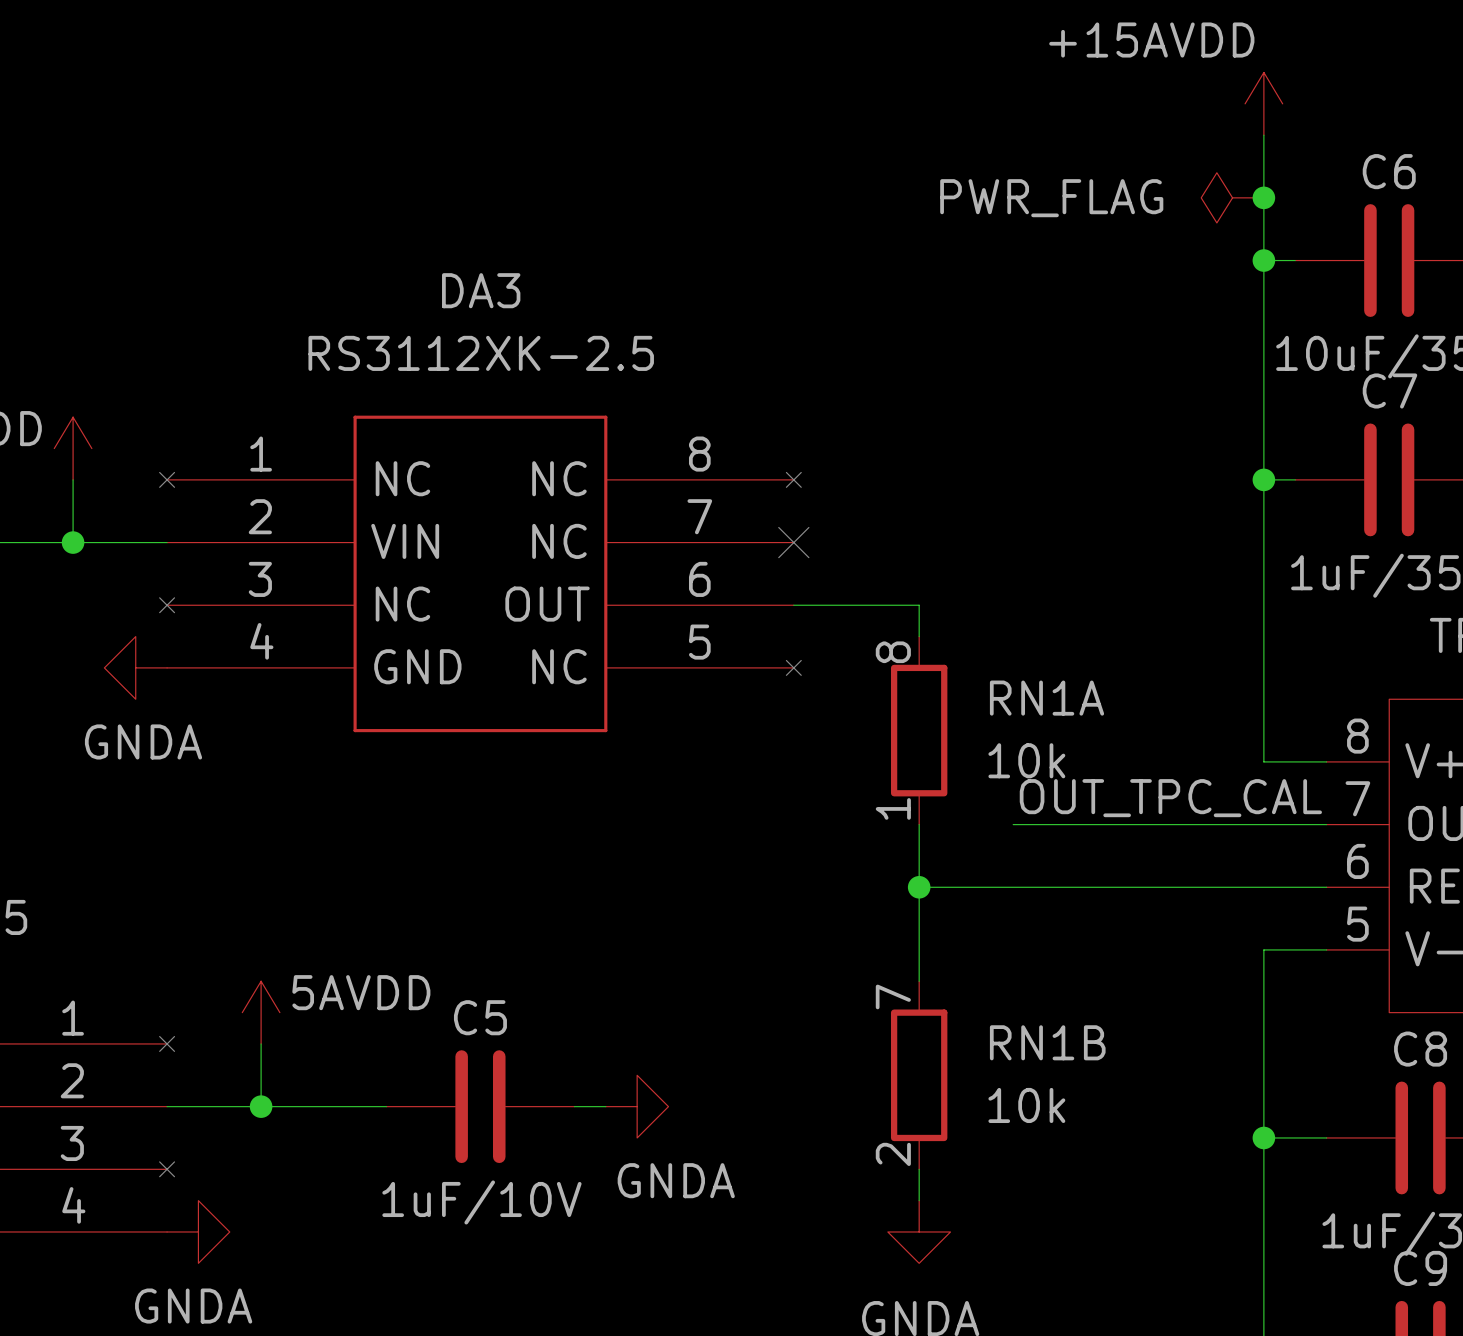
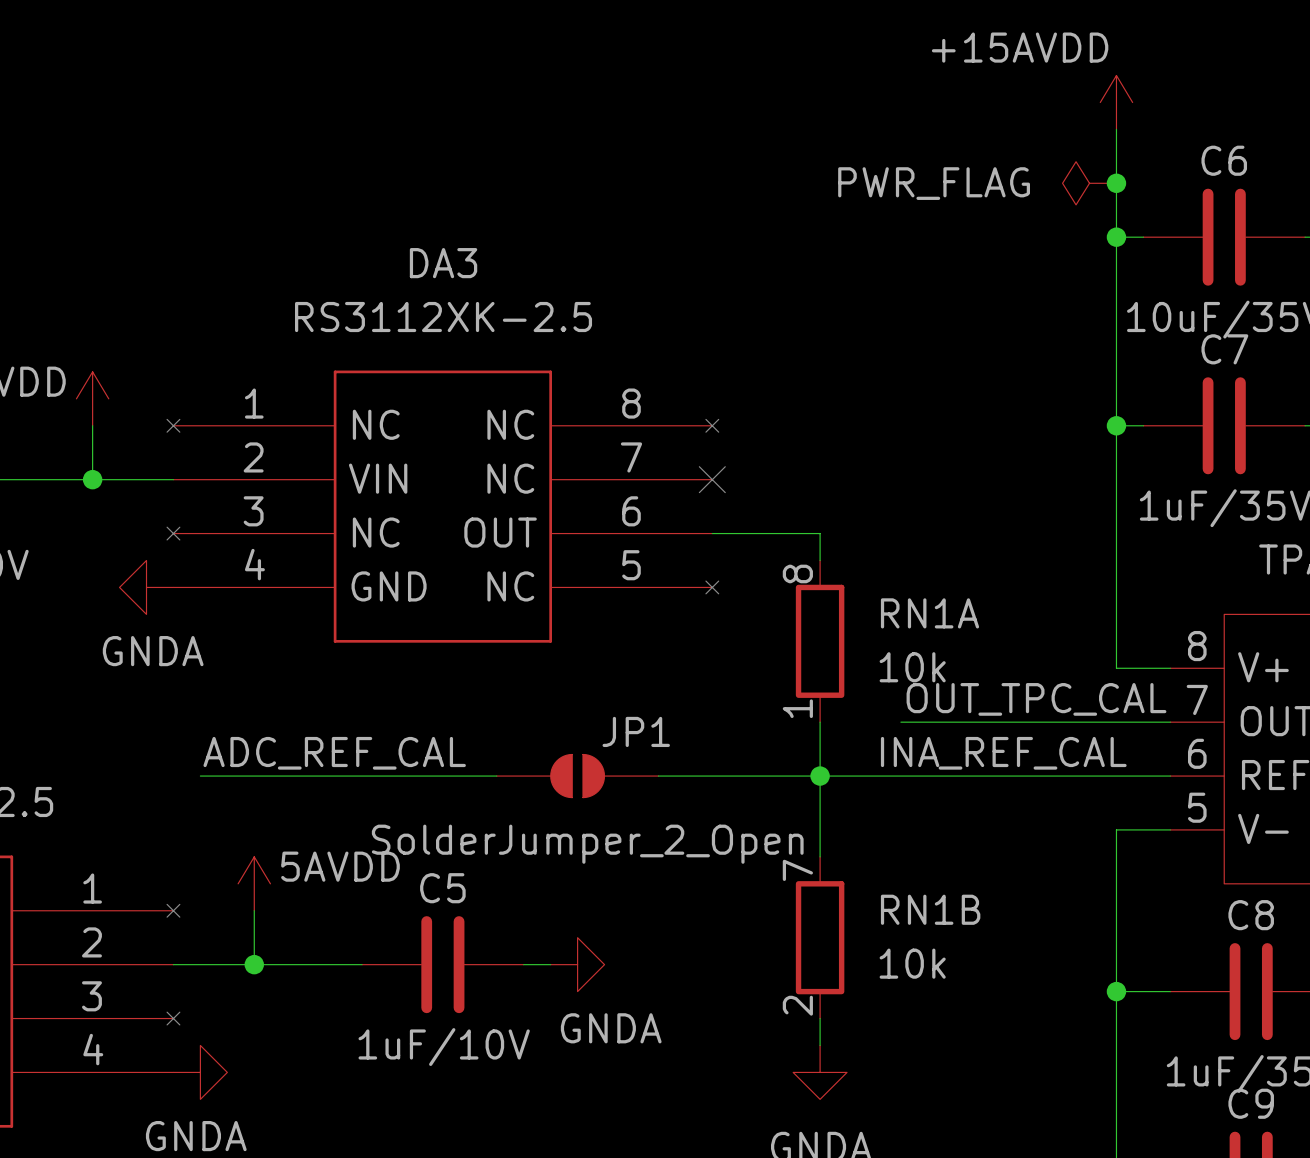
label: none -> ADC_REF_CAL (334, 753)
label: none -> INA_REF_CAL (1003, 753)
wire: none -> (200, 776) (496, 776)
JP1: none -> SolderJumper_2_Open (577, 776)
wire: none -> (658, 776) (820, 776)

